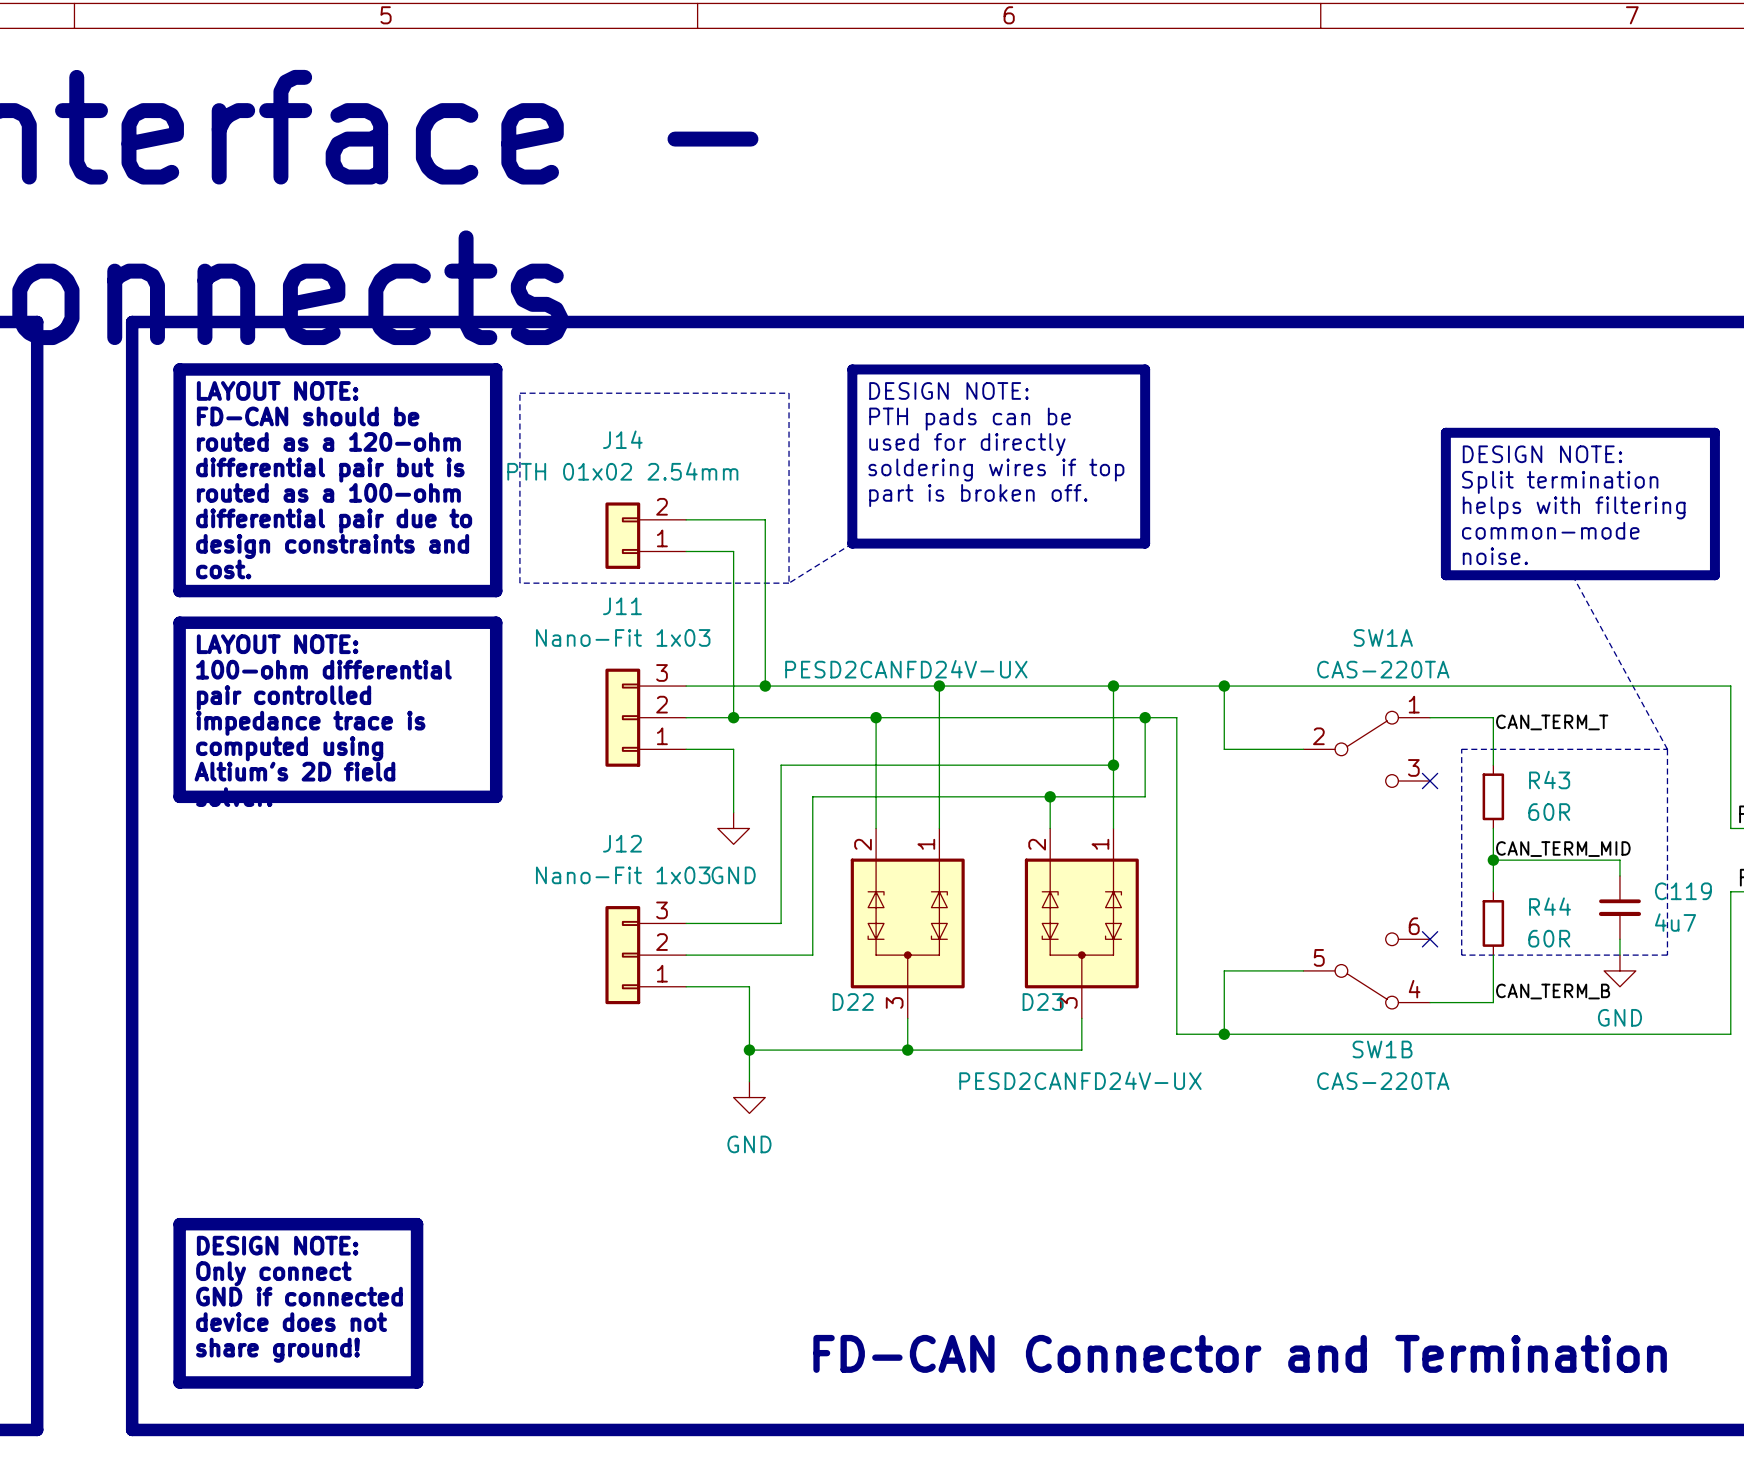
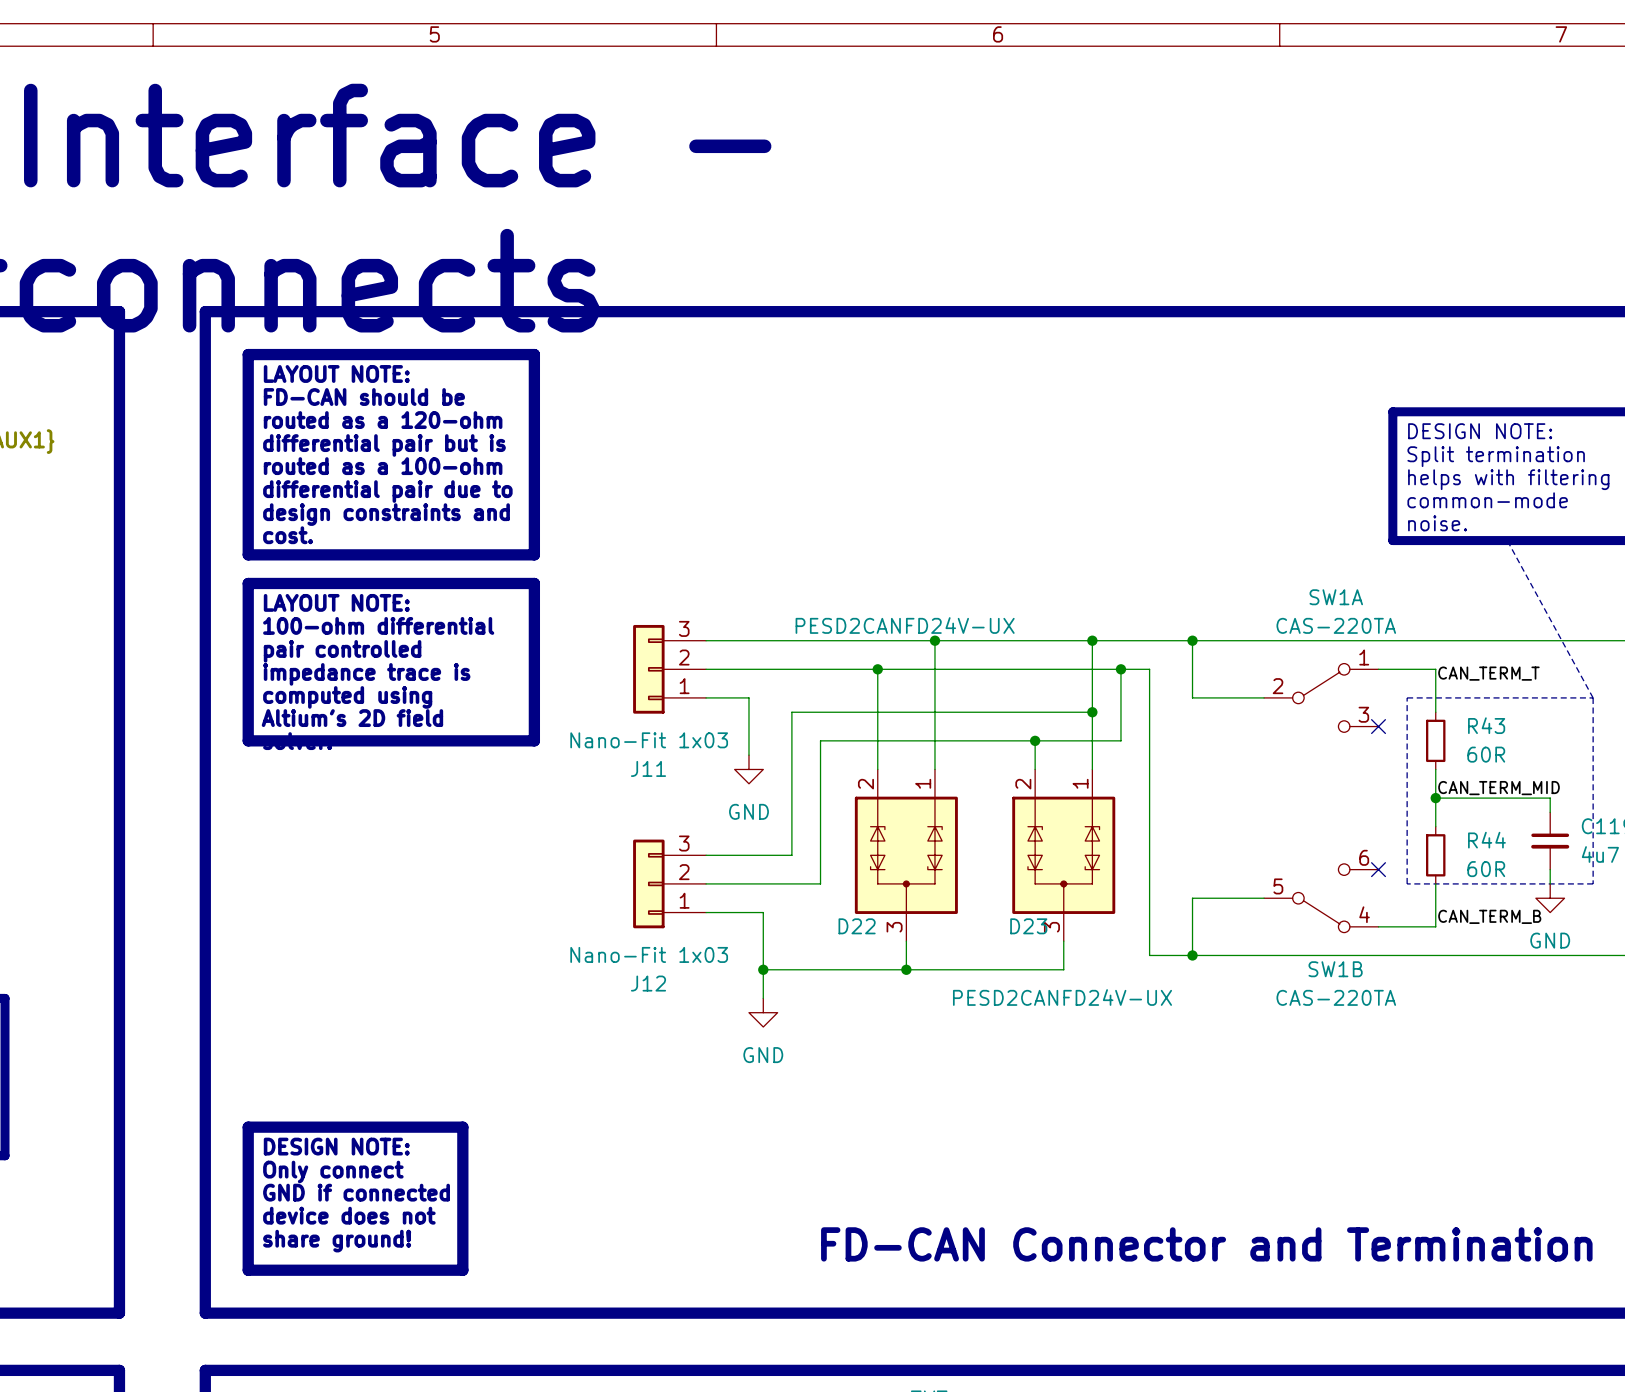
text: DESIGN NOTE: (948, 390) -> none
text: PTH pads can be (970, 419) -> none
text: used for directly (967, 444) -> none
text: soldering wires if top (996, 470) -> none
text: part is broken off. (978, 495) -> none
wire: (686, 519) (765, 519) (765, 686) -> none
J14: PTH 01x02 2.54mm (645, 535) -> none
line: (852, 543) (789, 583) -> none
line: (852, 543) (1145, 543) (1145, 369) (852, 369) (852, 543) -> none
wire: (686, 551) (733, 551) (733, 717) -> none
line: (789, 583) (789, 393) (519, 393) (519, 583) (789, 583) -> none
J11 name position: J11 (622, 606) -> J11 (648, 768)
J11 value position: Nano-Fit 1x03 (623, 637) -> Nano-Fit 1x03 (649, 740)
junction: (765, 686) -> none
junction: (733, 717) -> none
J12 name position: J12 (622, 843) -> J12 (648, 983)
J12 value position: Nano-Fit 1x03 (623, 875) -> Nano-Fit 1x03 (649, 954)

